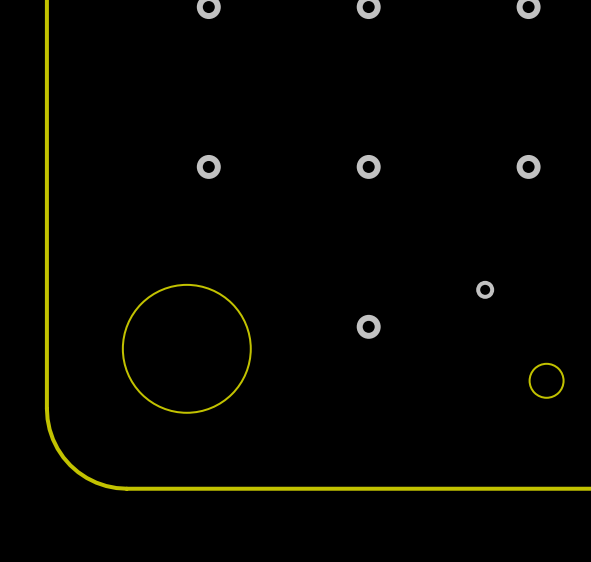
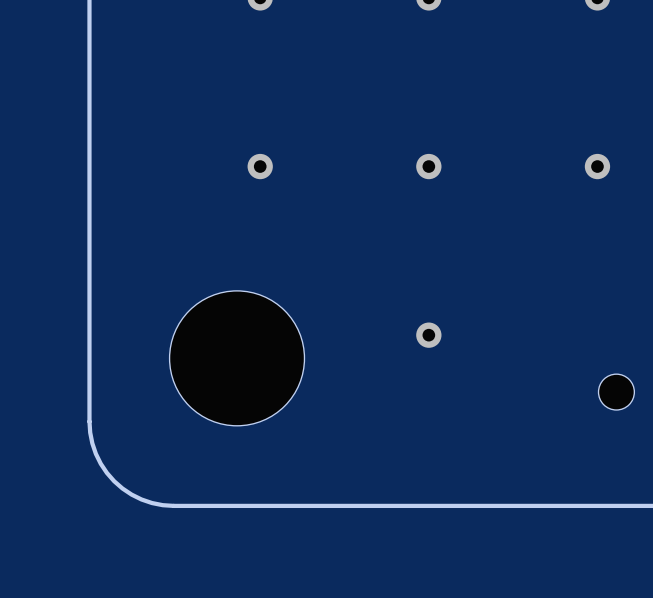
via: (485, 289) -> none

